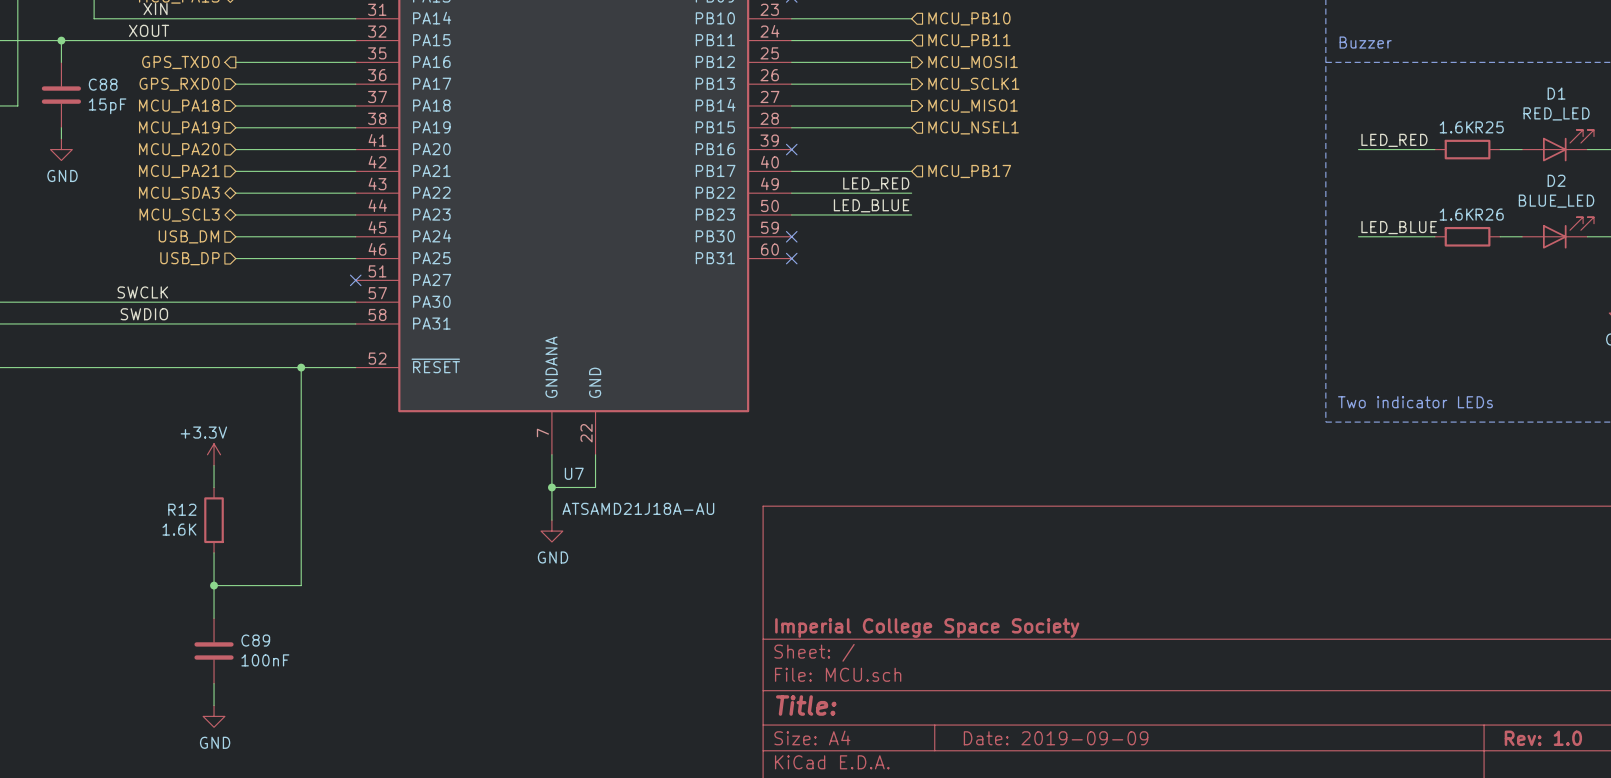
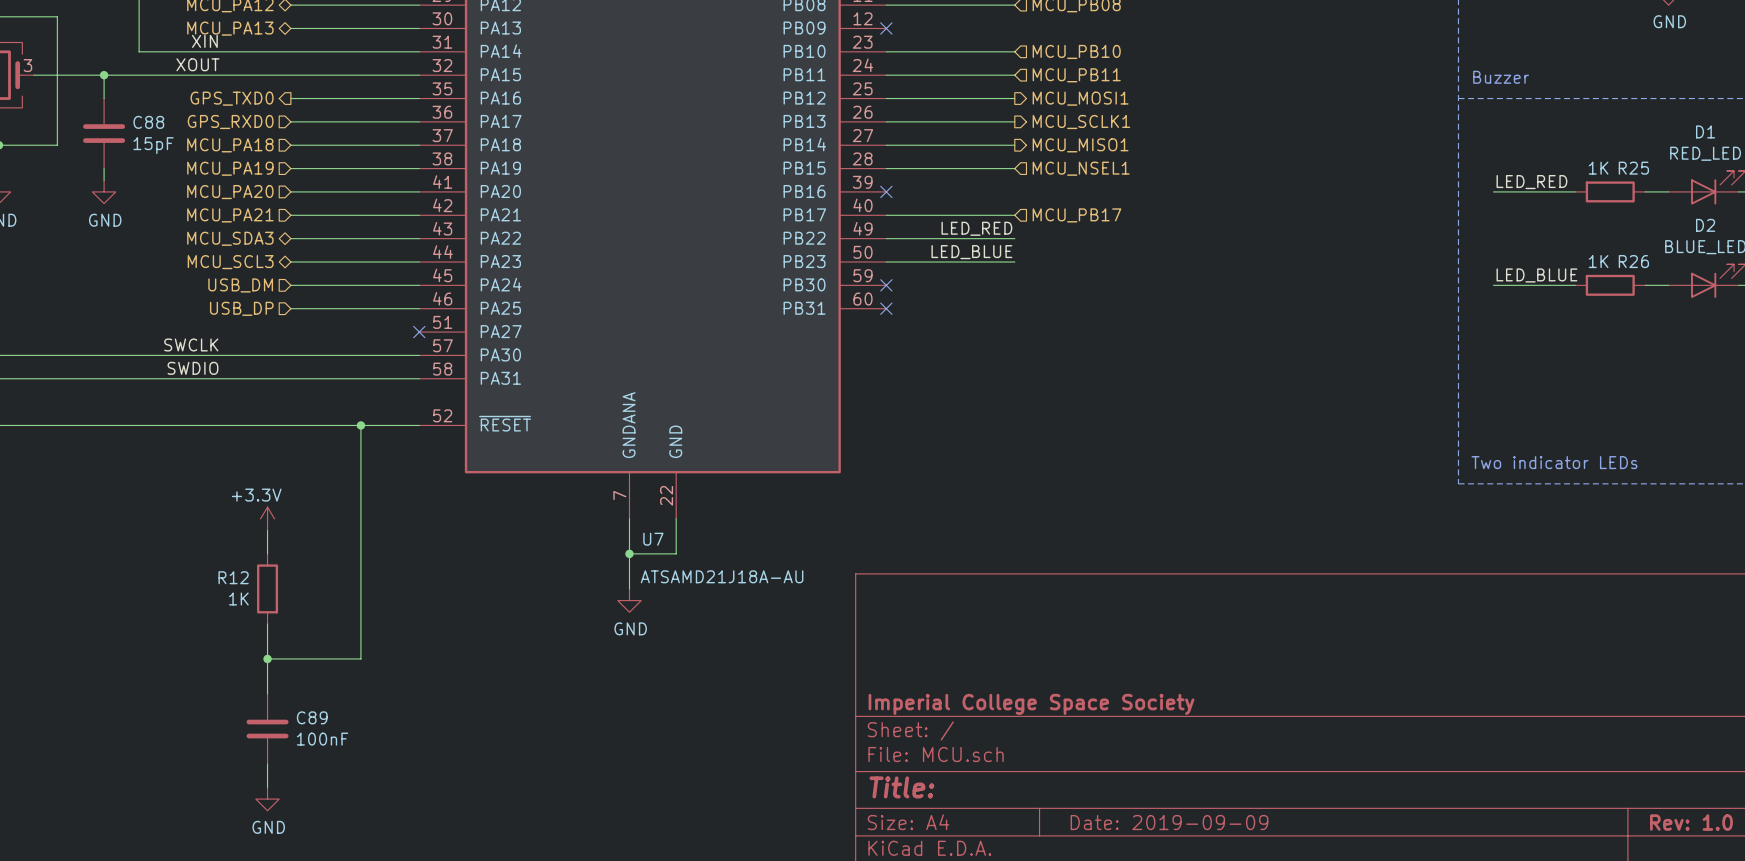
R25 value: 1.6K (1456, 127) -> 1K (1598, 168)
R26 value: 1.6K (1456, 214) -> 1K (1598, 261)
R12 value: 1.6K (179, 529) -> 1K (238, 598)

